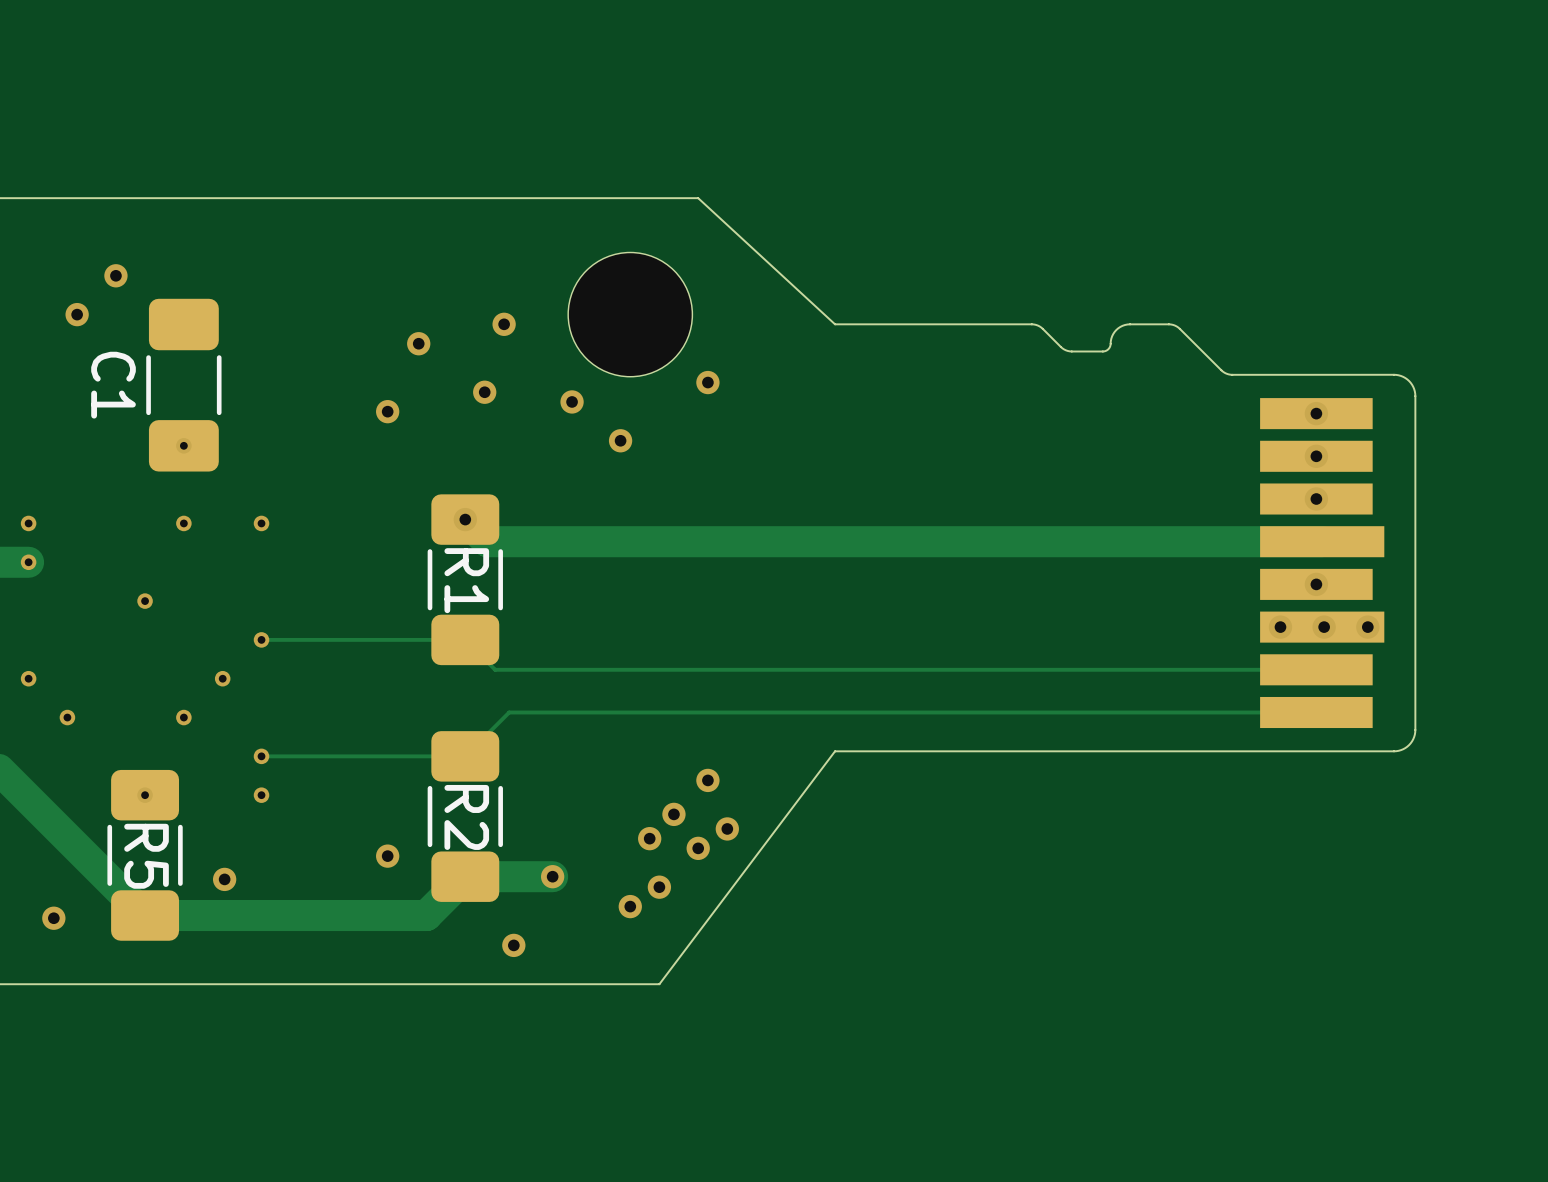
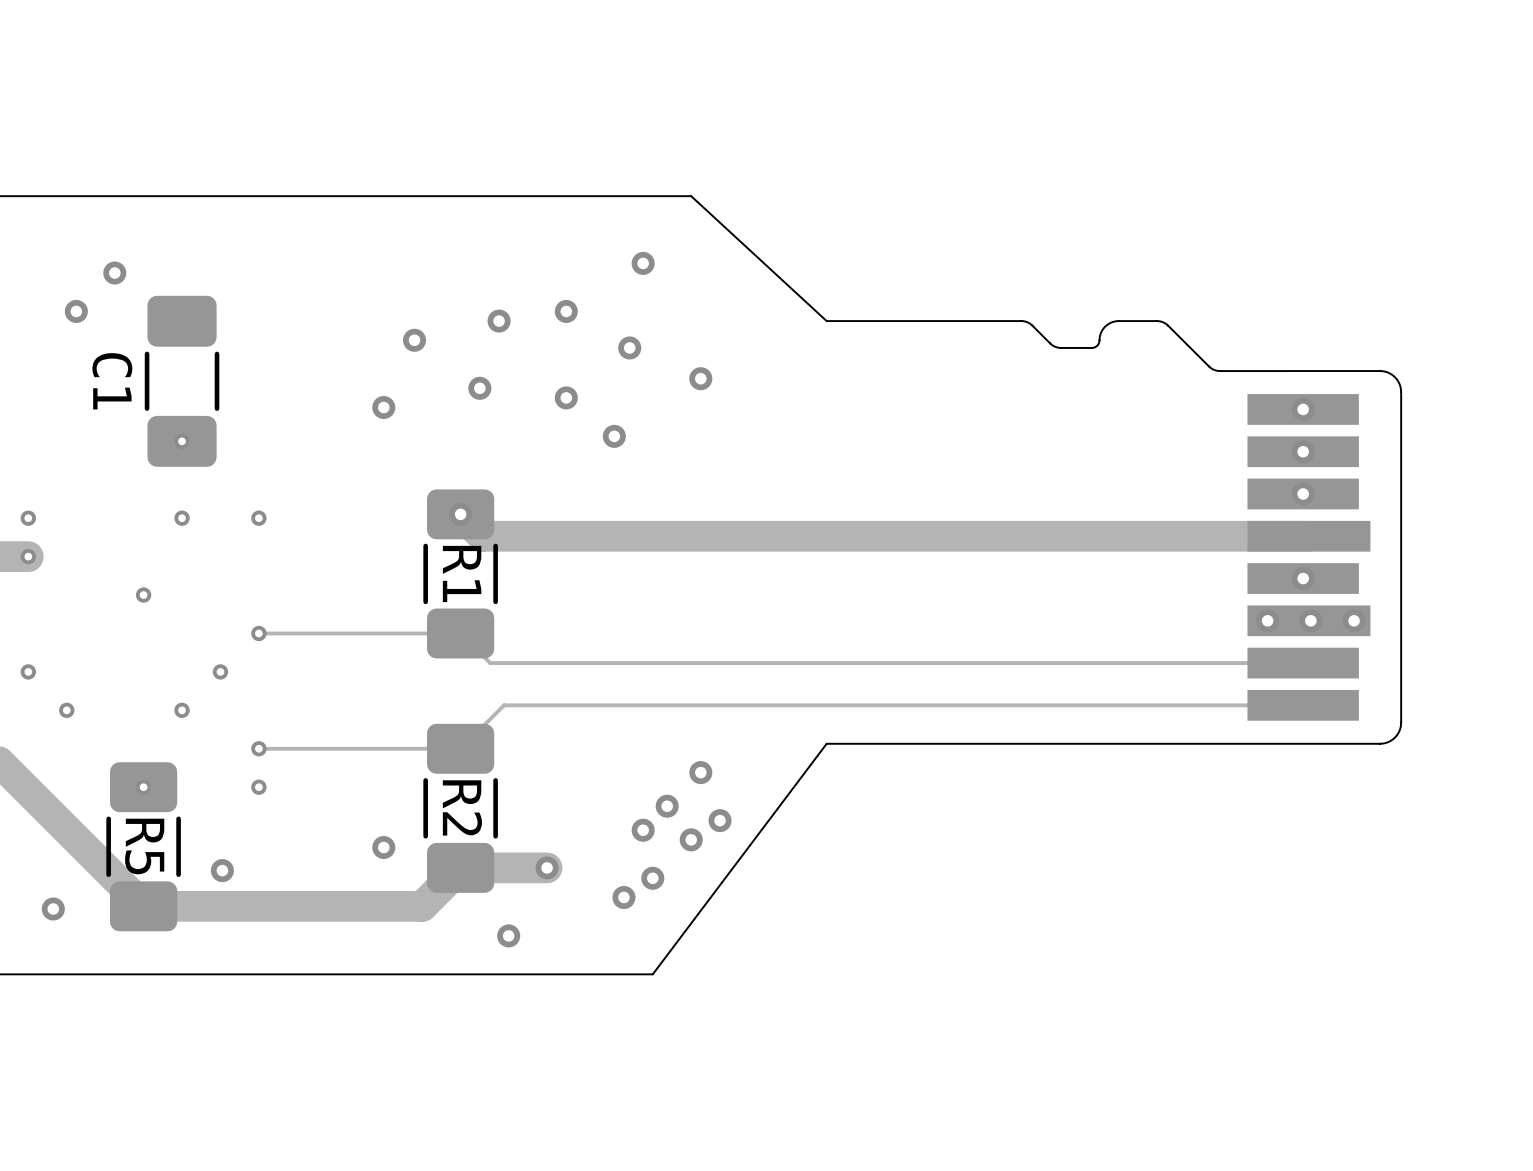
via: none -> (643, 263)
via: none -> (566, 311)
part: (630, 314) -> none
via: none -> (629, 347)

